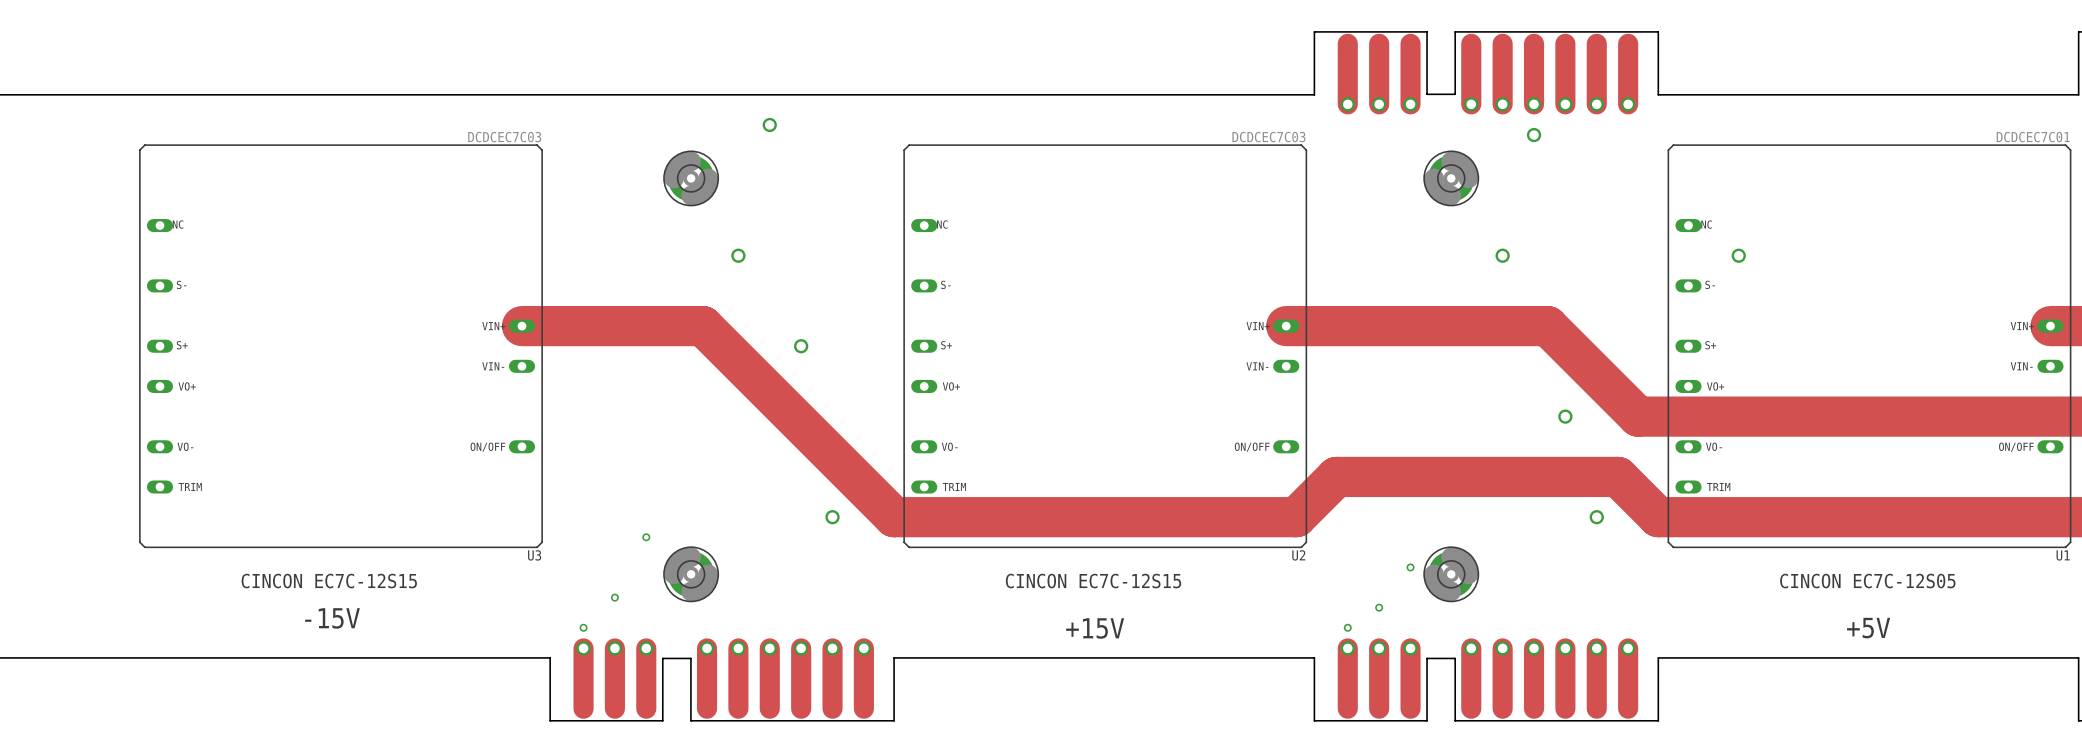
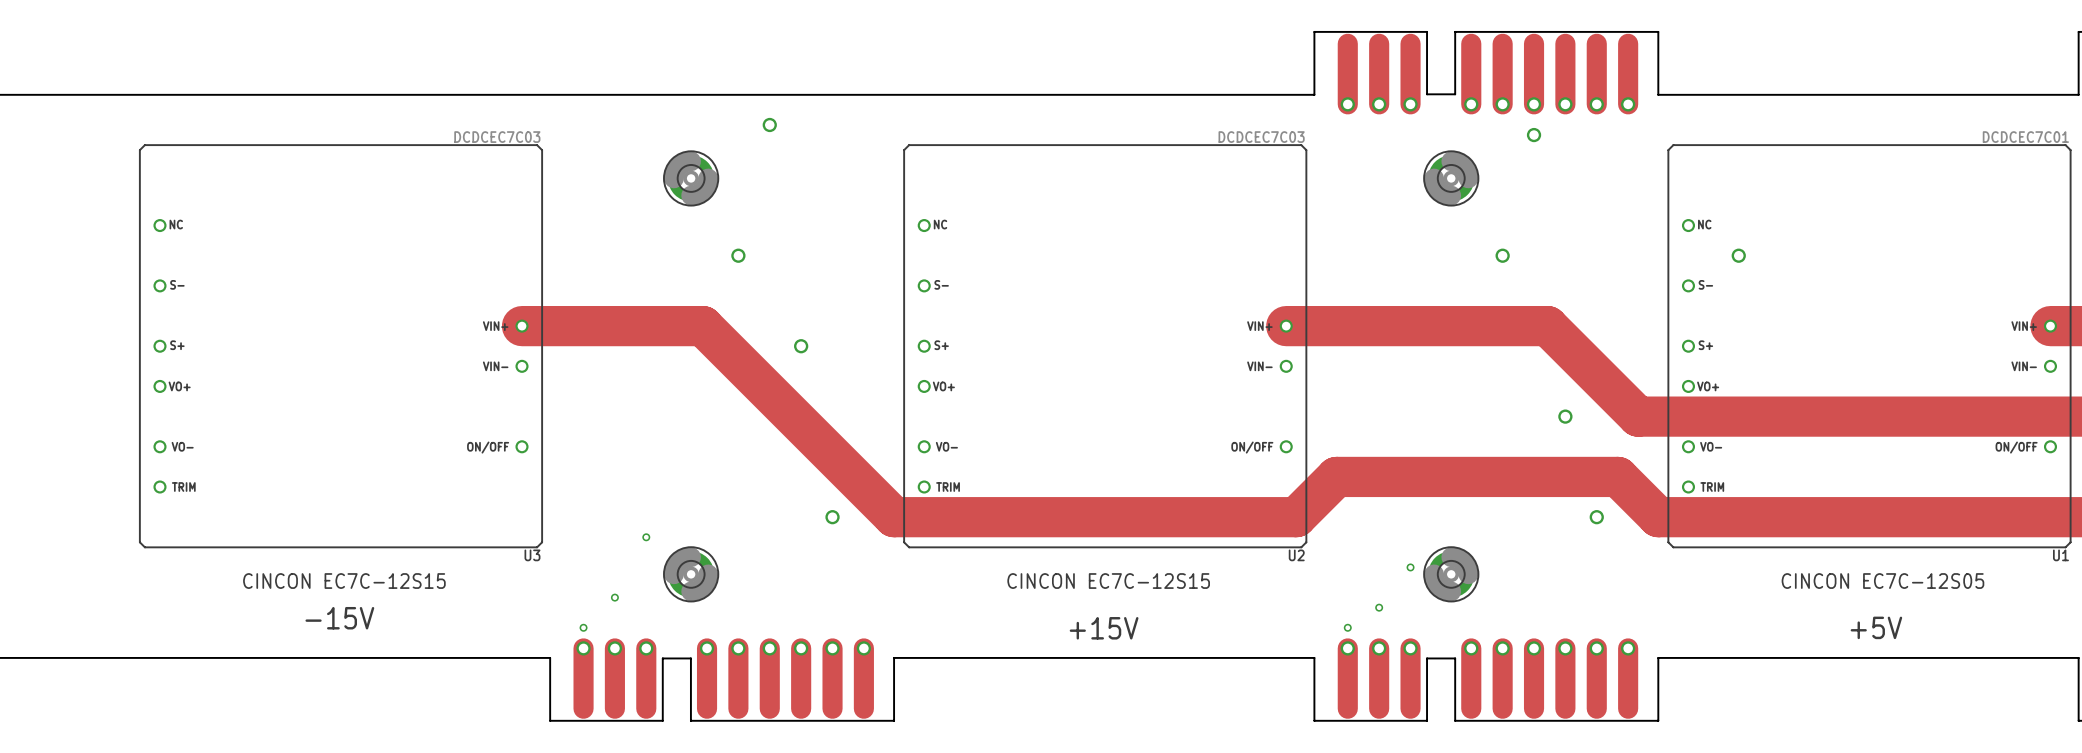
U3 footprint: [139, 144, 543, 548] -> [139, 144, 543, 548]
U2 footprint: [903, 144, 1307, 548] -> [903, 144, 1307, 548]
U1 footprint: [1667, 144, 2072, 548] -> [1667, 144, 2072, 548]

